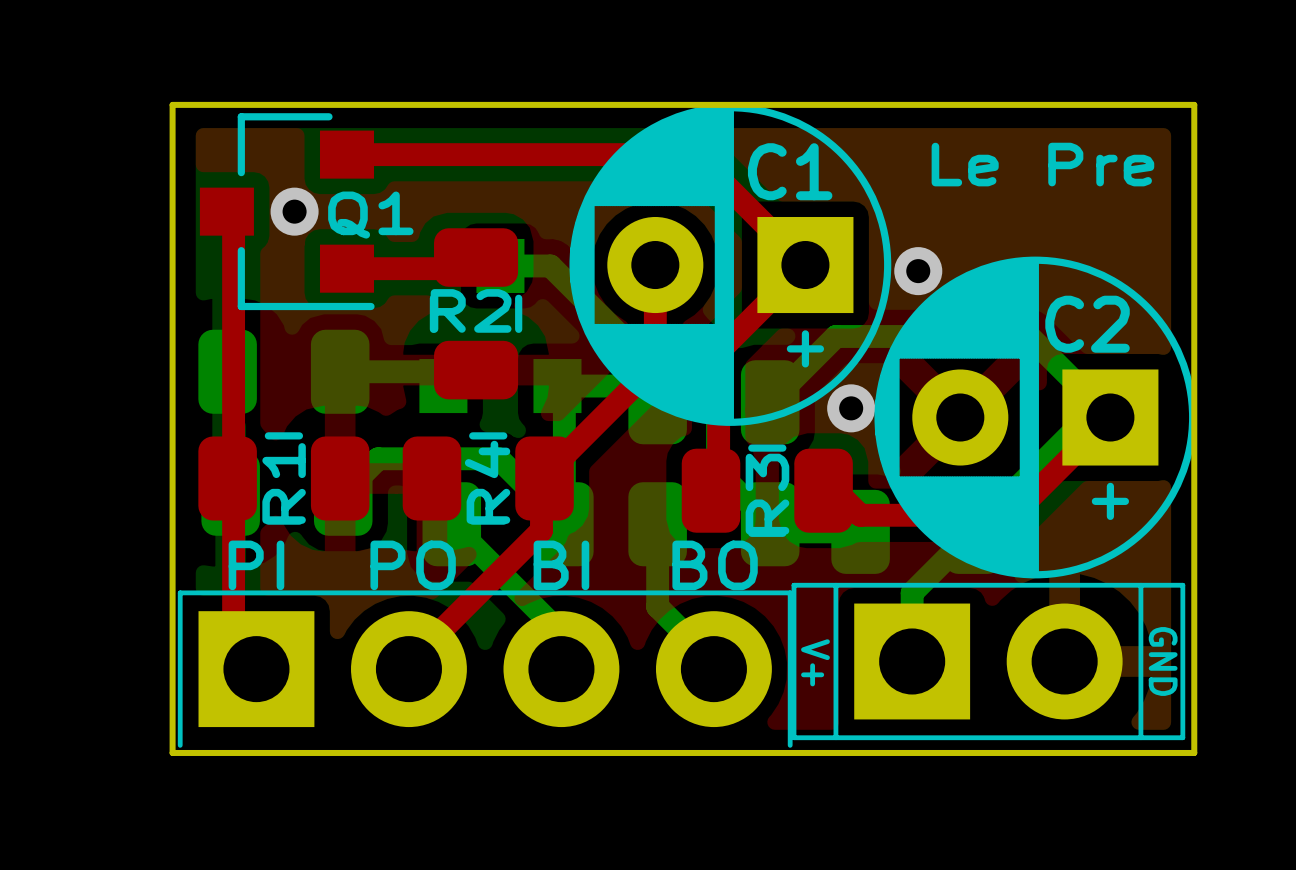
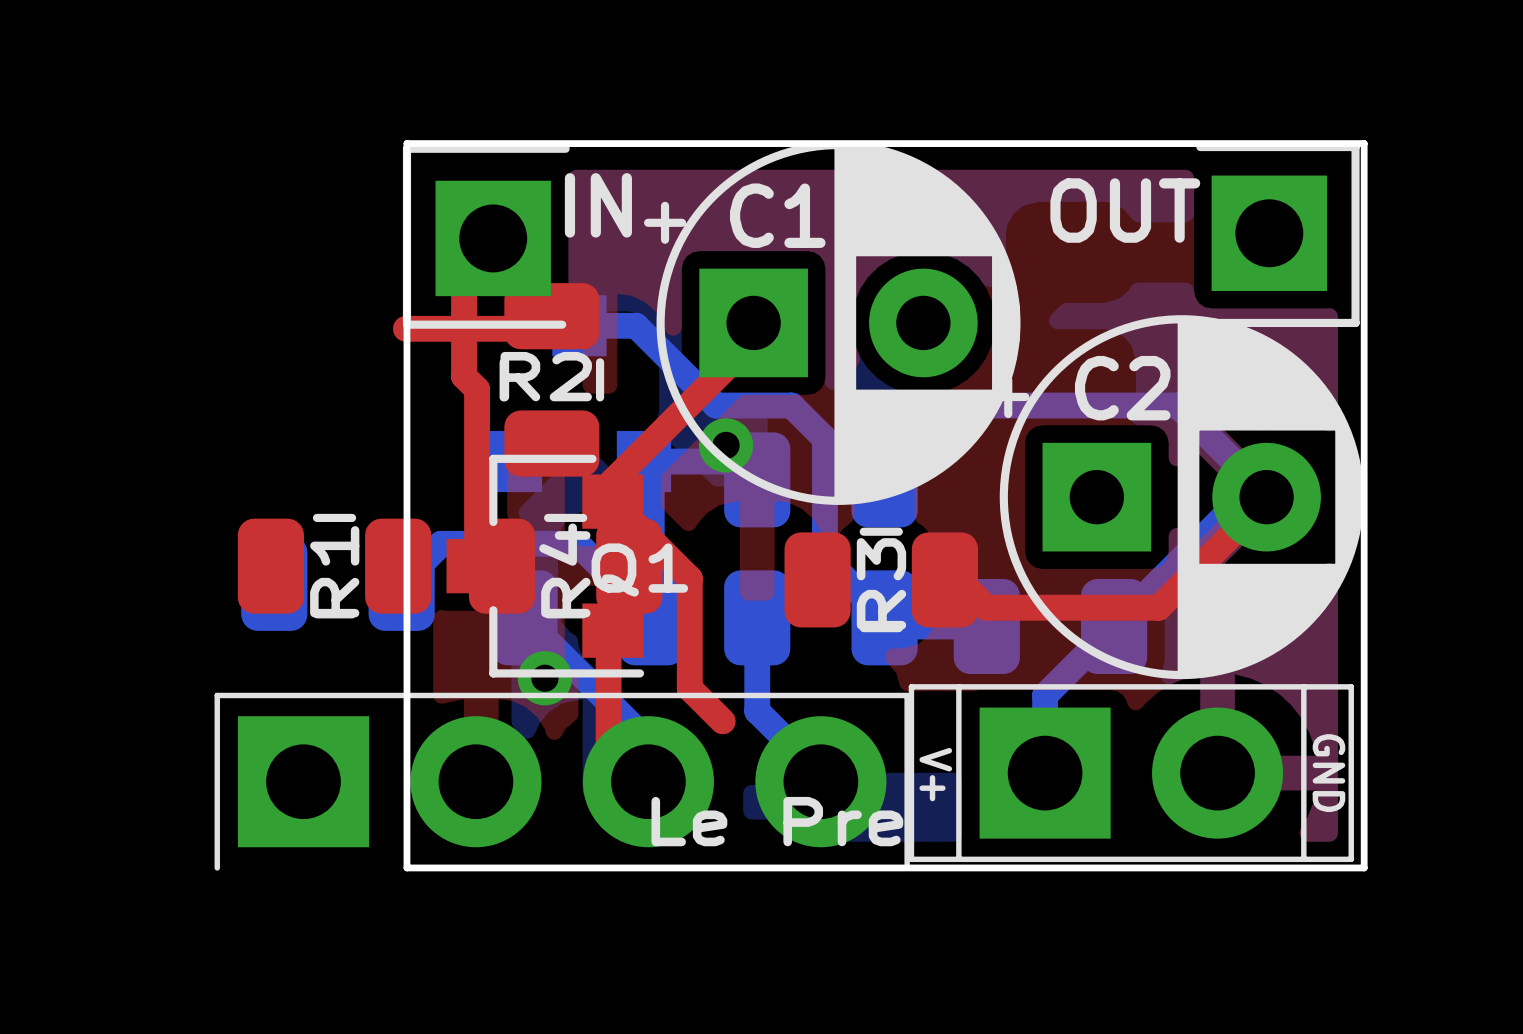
board edge: (347, 104) (172, 104) (172, 752) (1194, 752) (1194, 745) -> (406, 143) (406, 867) (1364, 867)
C1 footprint: [569, 104, 892, 426] -> [643, 140, 1021, 505]
top track: (346, 154) (695, 154) (805, 265) (718, 351) (718, 486) -> none
text position: Le Pre (1042, 164) -> Le Pre (777, 821)
part: none -> OUT (1276, 234)
part: none -> IN (486, 236)
top track: none -> (493, 238) (464, 267) (464, 376) (477, 389) (477, 548)
top track: (226, 211) (233, 218) (233, 640) (256, 663) -> none
Q1 position: (287, 211) -> (545, 566)
via: (294, 211) -> none
C2 footprint: [874, 256, 1197, 579] -> [987, 315, 1364, 680]
top track: (655, 265) (655, 364) (541, 478) (541, 530) (408, 663) -> none
top track: none -> (769, 324) (612, 480) (612, 501) (689, 578) (689, 688) (722, 721)
via: (918, 271) -> none
part: (283, 371) -> none
bottom track: (343, 371) (429, 371) (443, 386) -> none
via: none -> (726, 445)
via: (851, 408) -> none
top track: none -> (612, 630) (608, 634) (608, 755)
text: PI (256, 565) -> none
text: PO (413, 565) -> none
text: BI (561, 565) -> none
text: BO (715, 565) -> none
via: none -> (544, 678)

